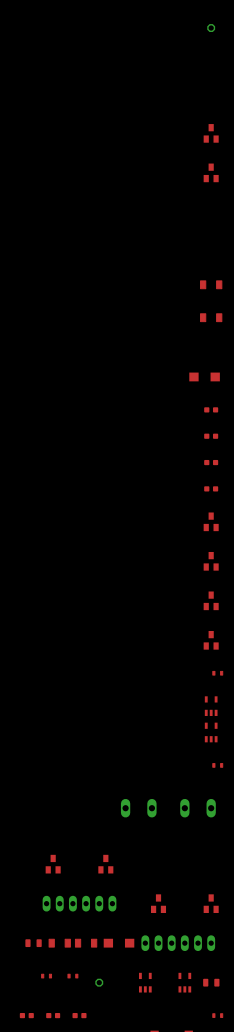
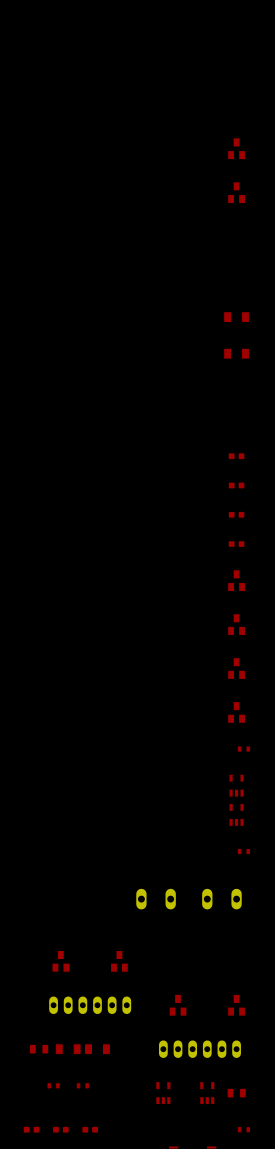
part: (211, 28) -> none
part: (204, 376) -> none
part: (119, 943) -> none
part: (99, 982) -> none

